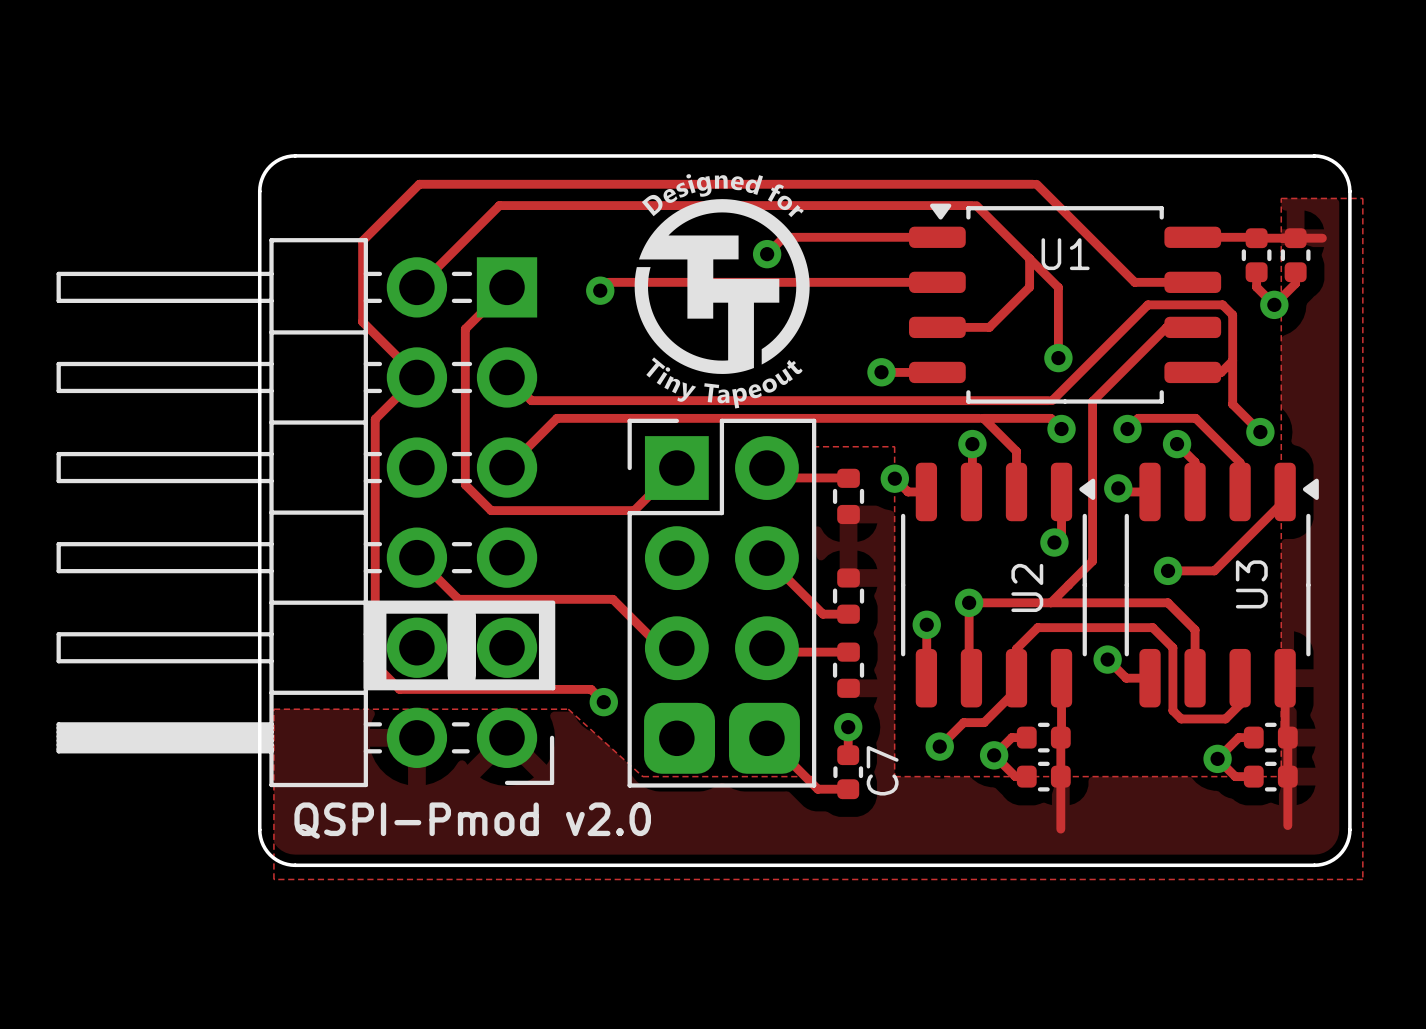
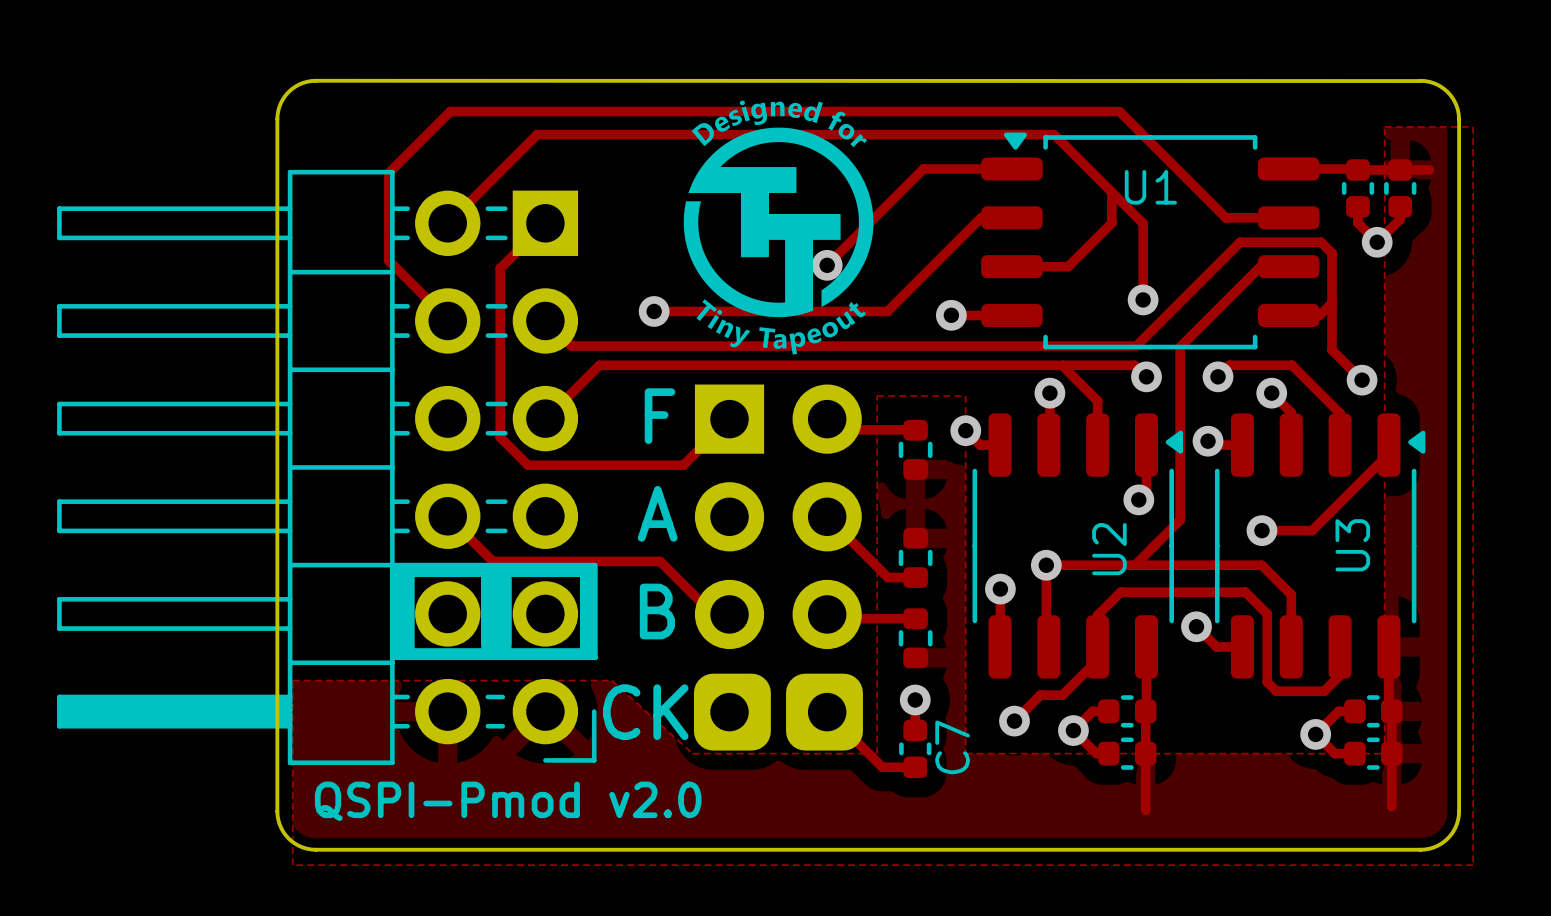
track: (855, 237) (783, 237) (767, 254) -> (923, 169) (827, 265)
via position: (767, 254) -> (827, 265)
track: (909, 282) (608, 282) (600, 290) -> (981, 217) (887, 311) (654, 311)
via position: (600, 290) -> (654, 311)
track: (416, 377) (375, 419) (375, 665) (399, 689) (591, 689) (603, 702) -> none
part footprint: [627, 418, 817, 788] -> [693, 384, 863, 751]
text: none -> F (659, 416)
text: none -> A (657, 513)
text: none -> B (657, 611)
via: (603, 702) -> none
text: none -> CK (645, 712)

